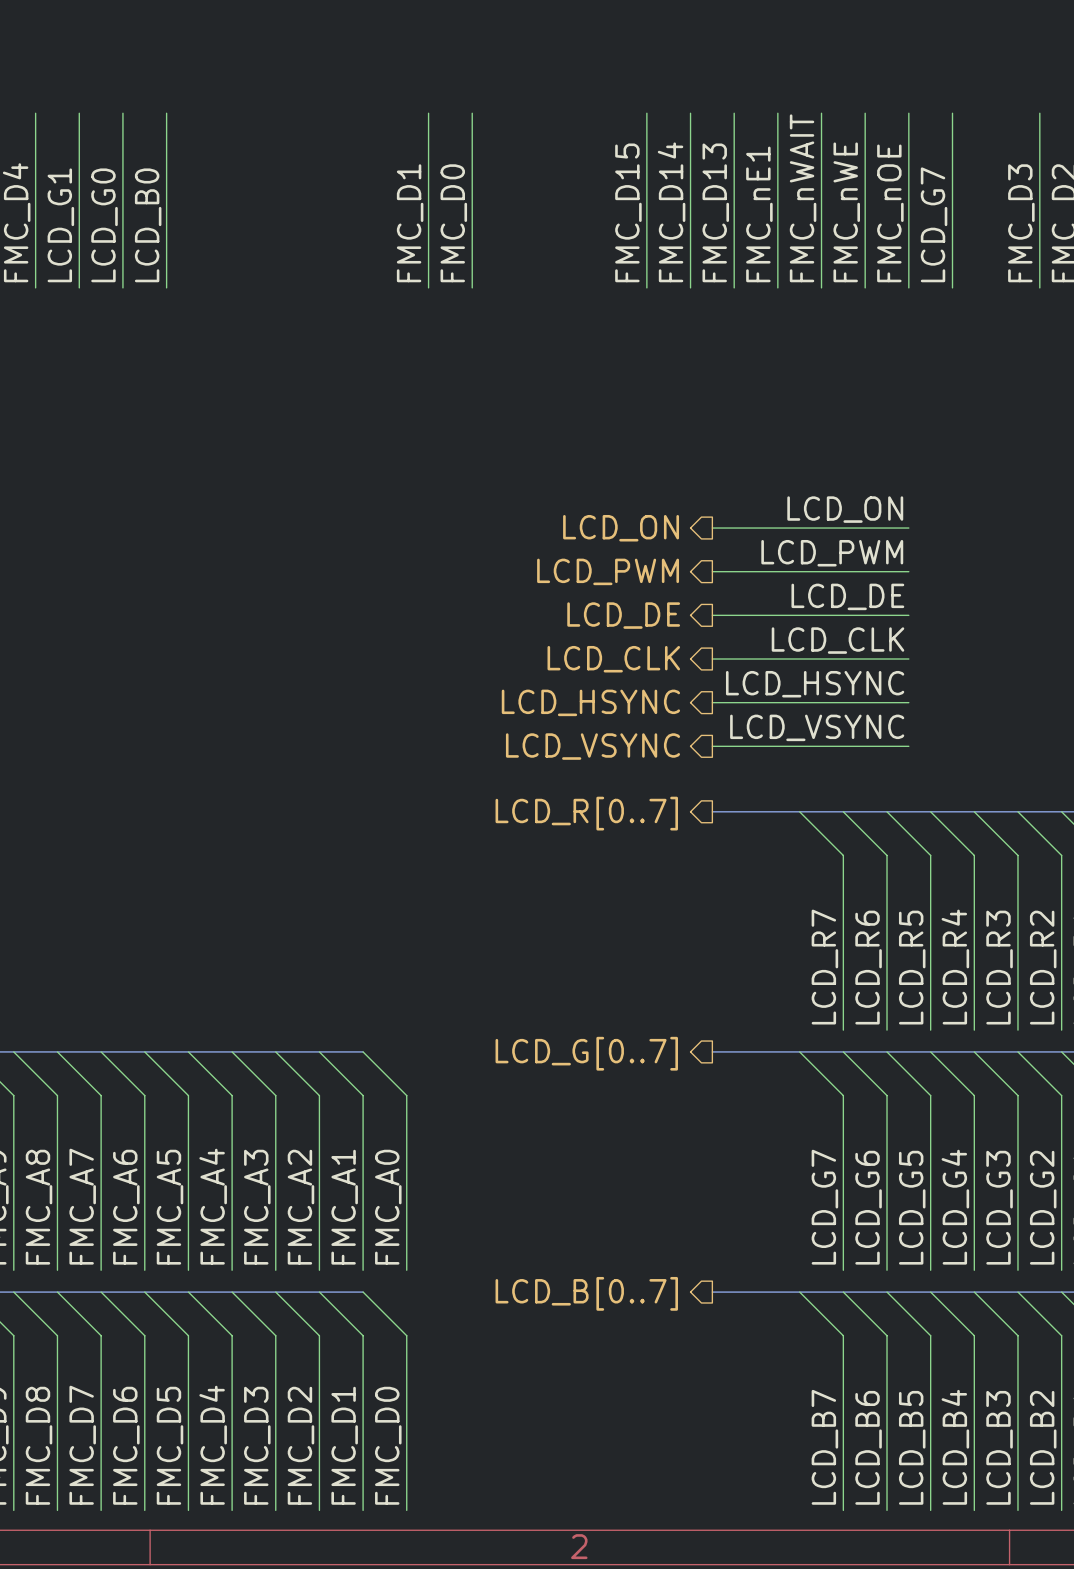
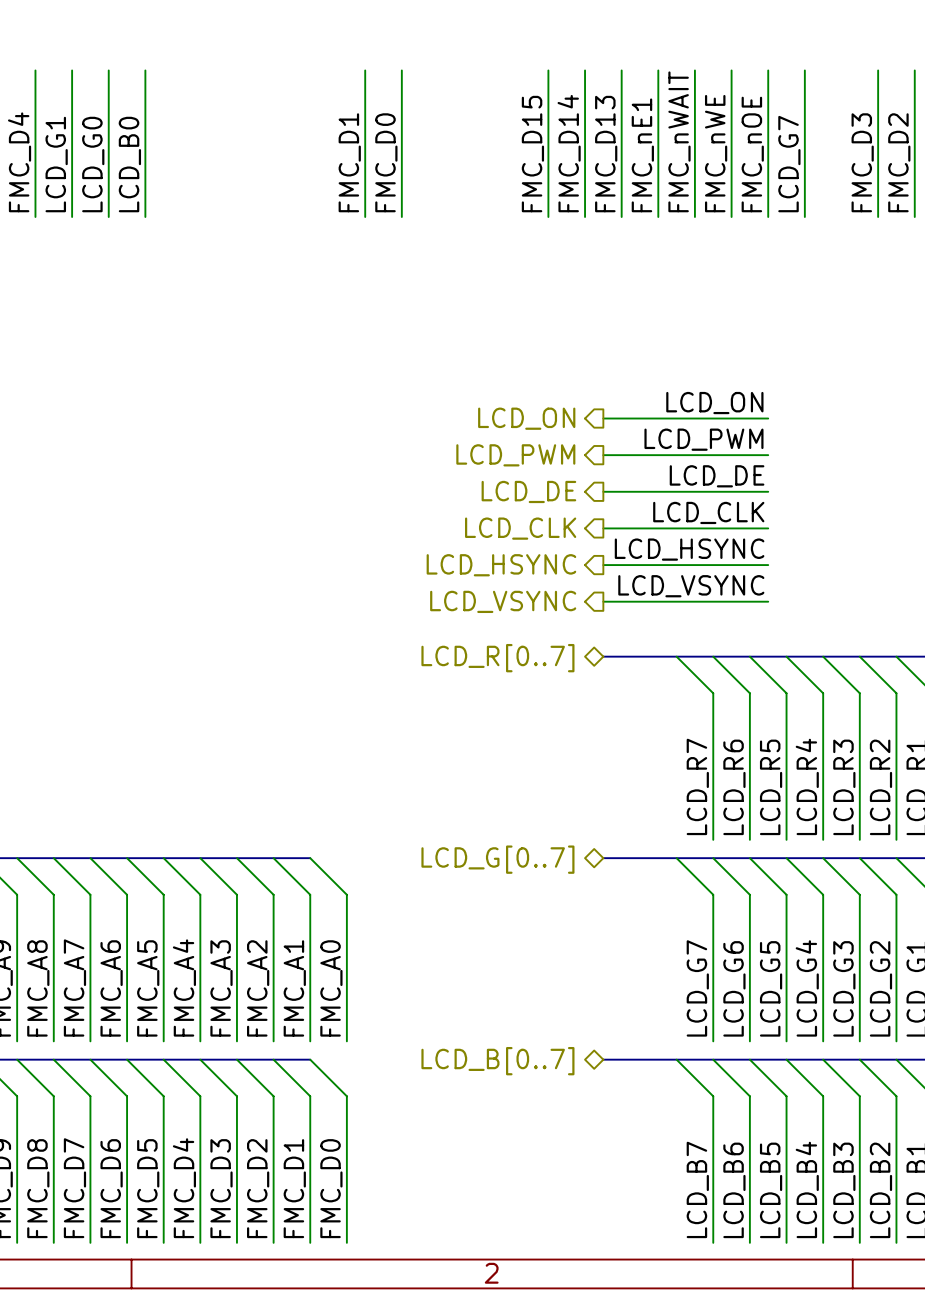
hierarchical label shape: output (586, 813) -> bidirectional (497, 658)
hierarchical label shape: output (586, 1053) -> bidirectional (497, 859)
hierarchical label shape: output (586, 1293) -> bidirectional (497, 1061)

